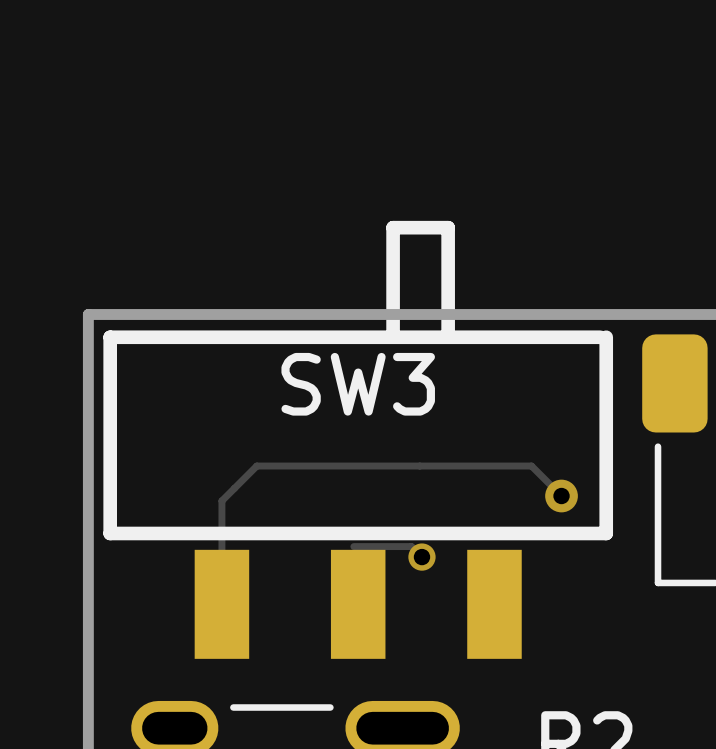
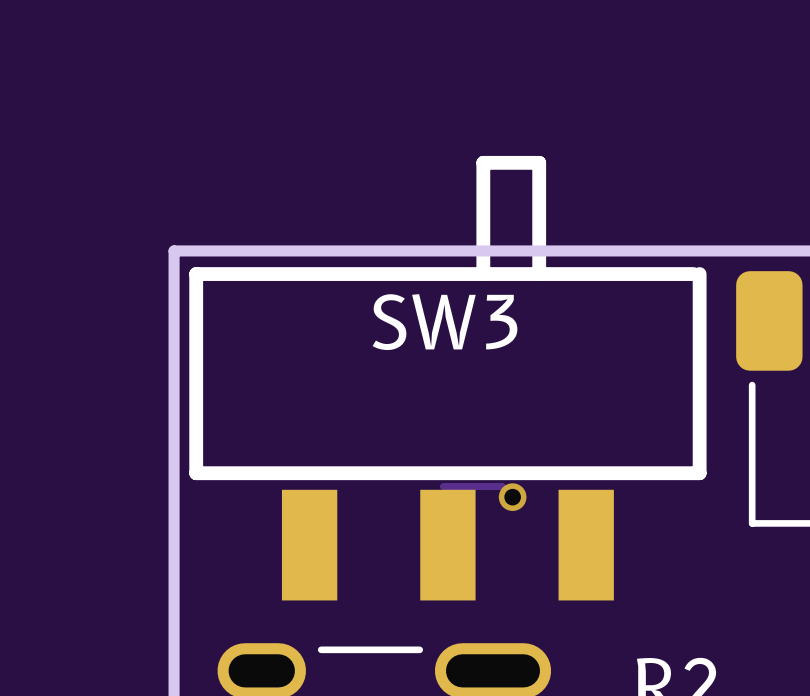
track: (561, 496) (531, 466) (256, 466) (221, 500) (221, 604) -> none
via: (561, 496) -> none

